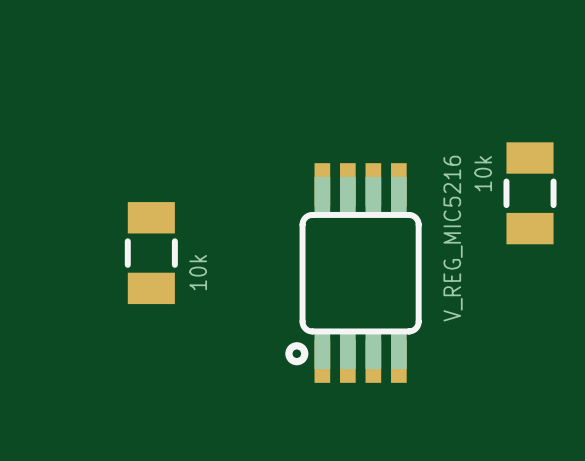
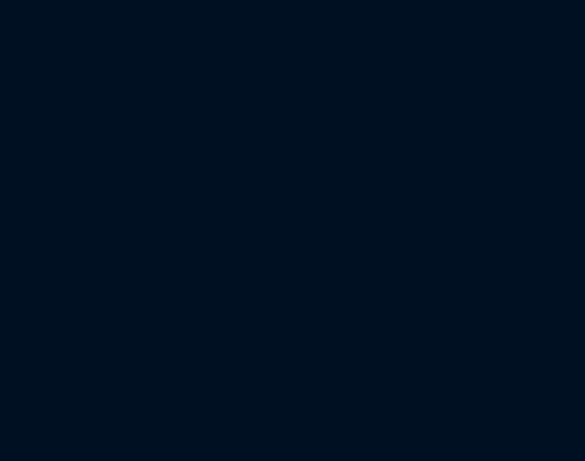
part: 10k (530, 193) -> none
part: 10k (151, 253) -> none
part: V_REG_MIC5216 (353, 273) -> none

